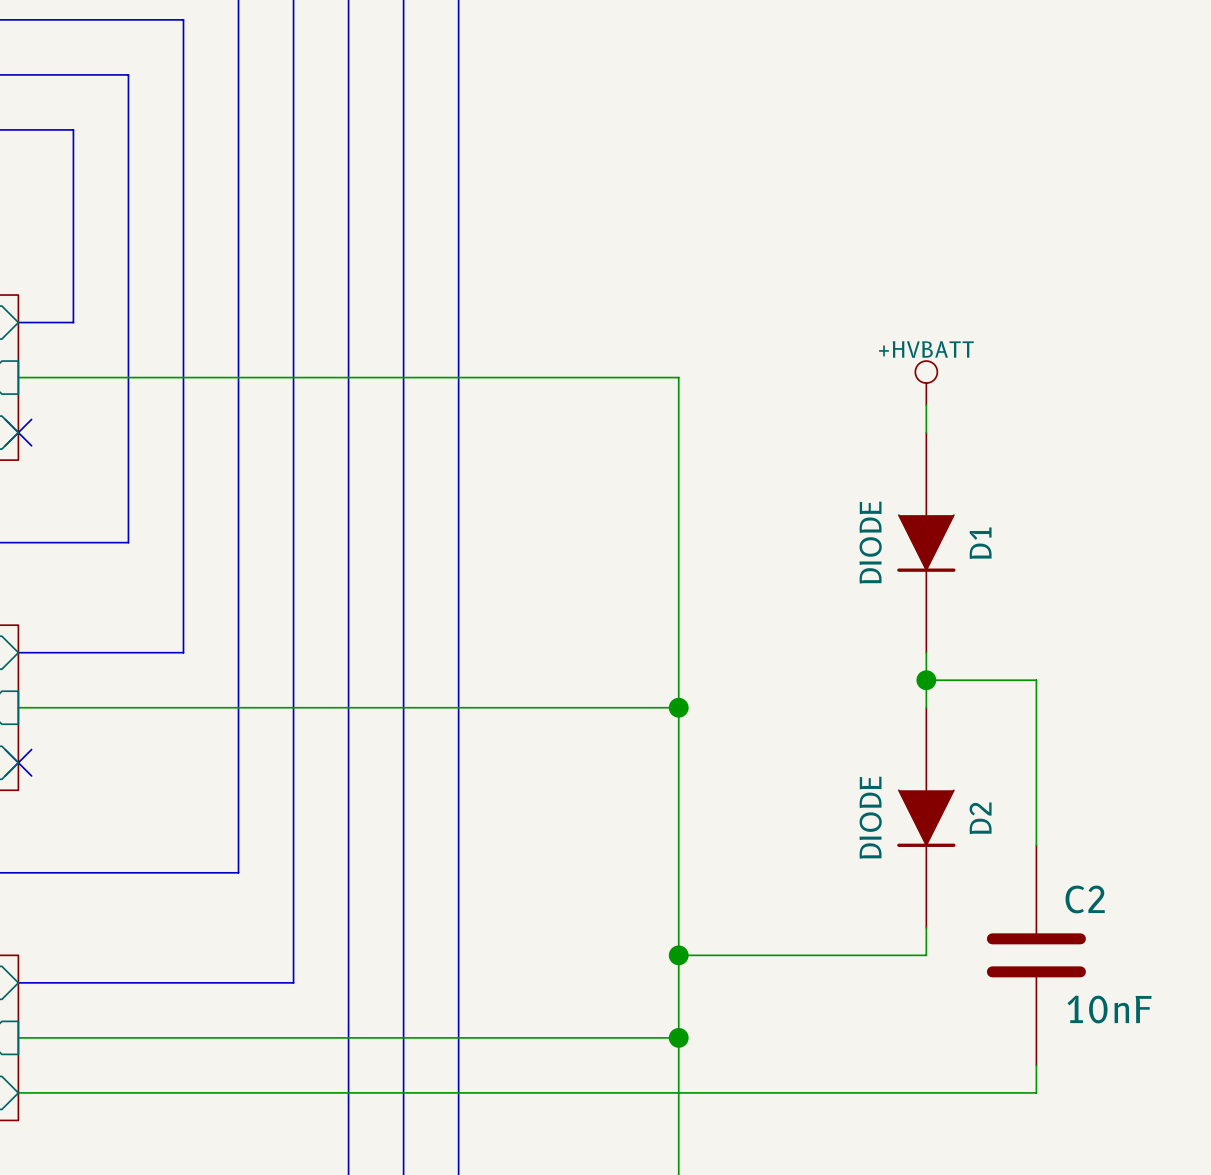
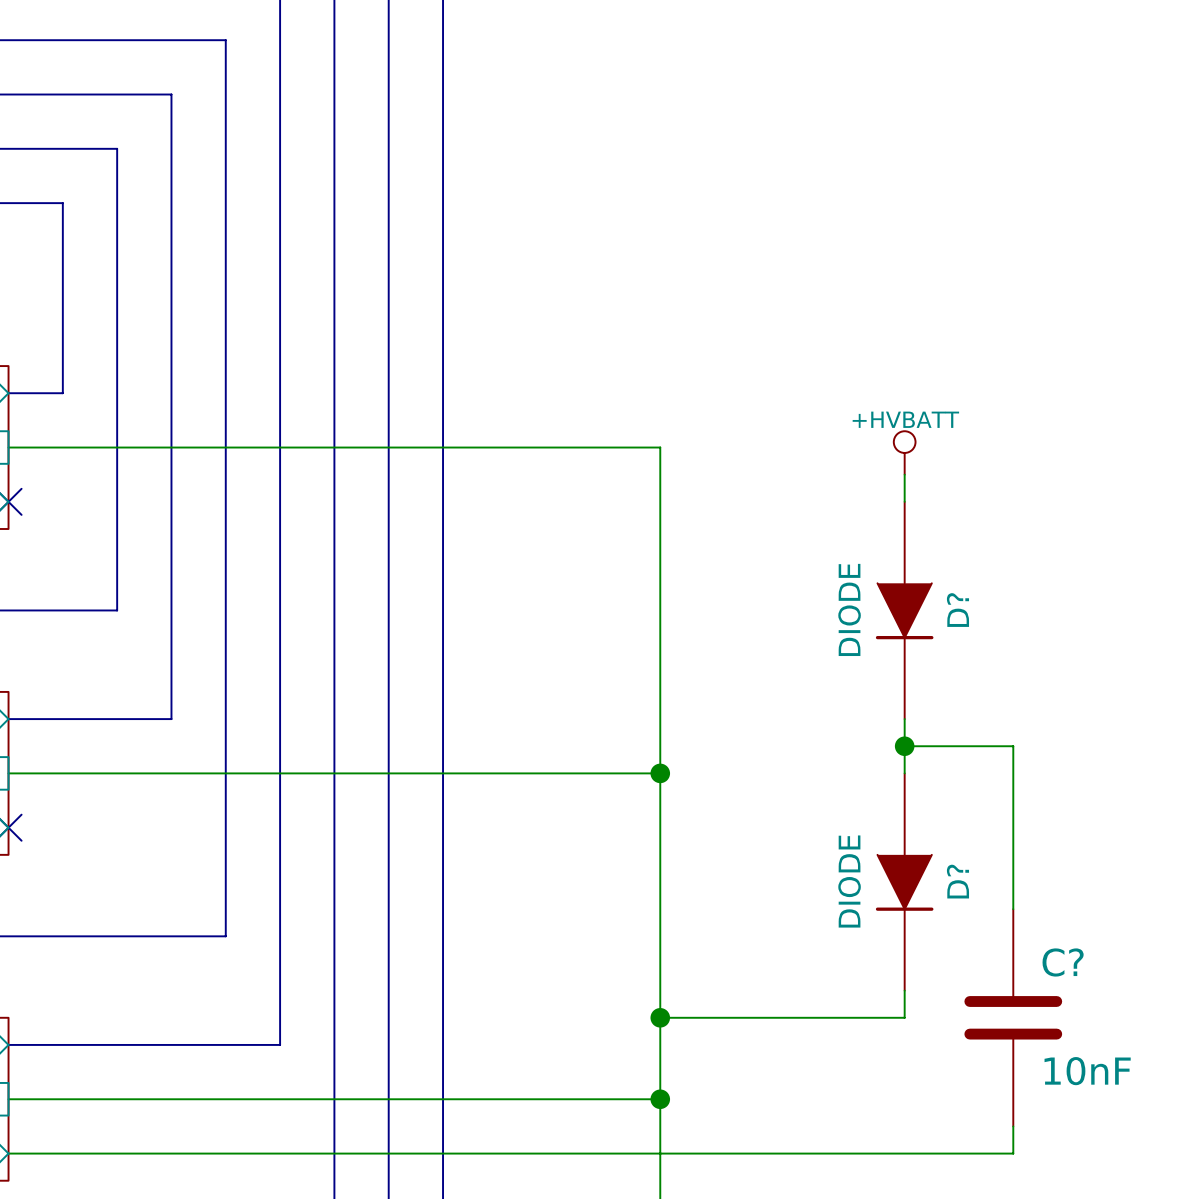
D1 name: D1 (980, 543) -> D? (957, 610)
D2 name: D2 (980, 818) -> D? (957, 881)
C2 name: C2 (1085, 899) -> C? (1063, 962)

